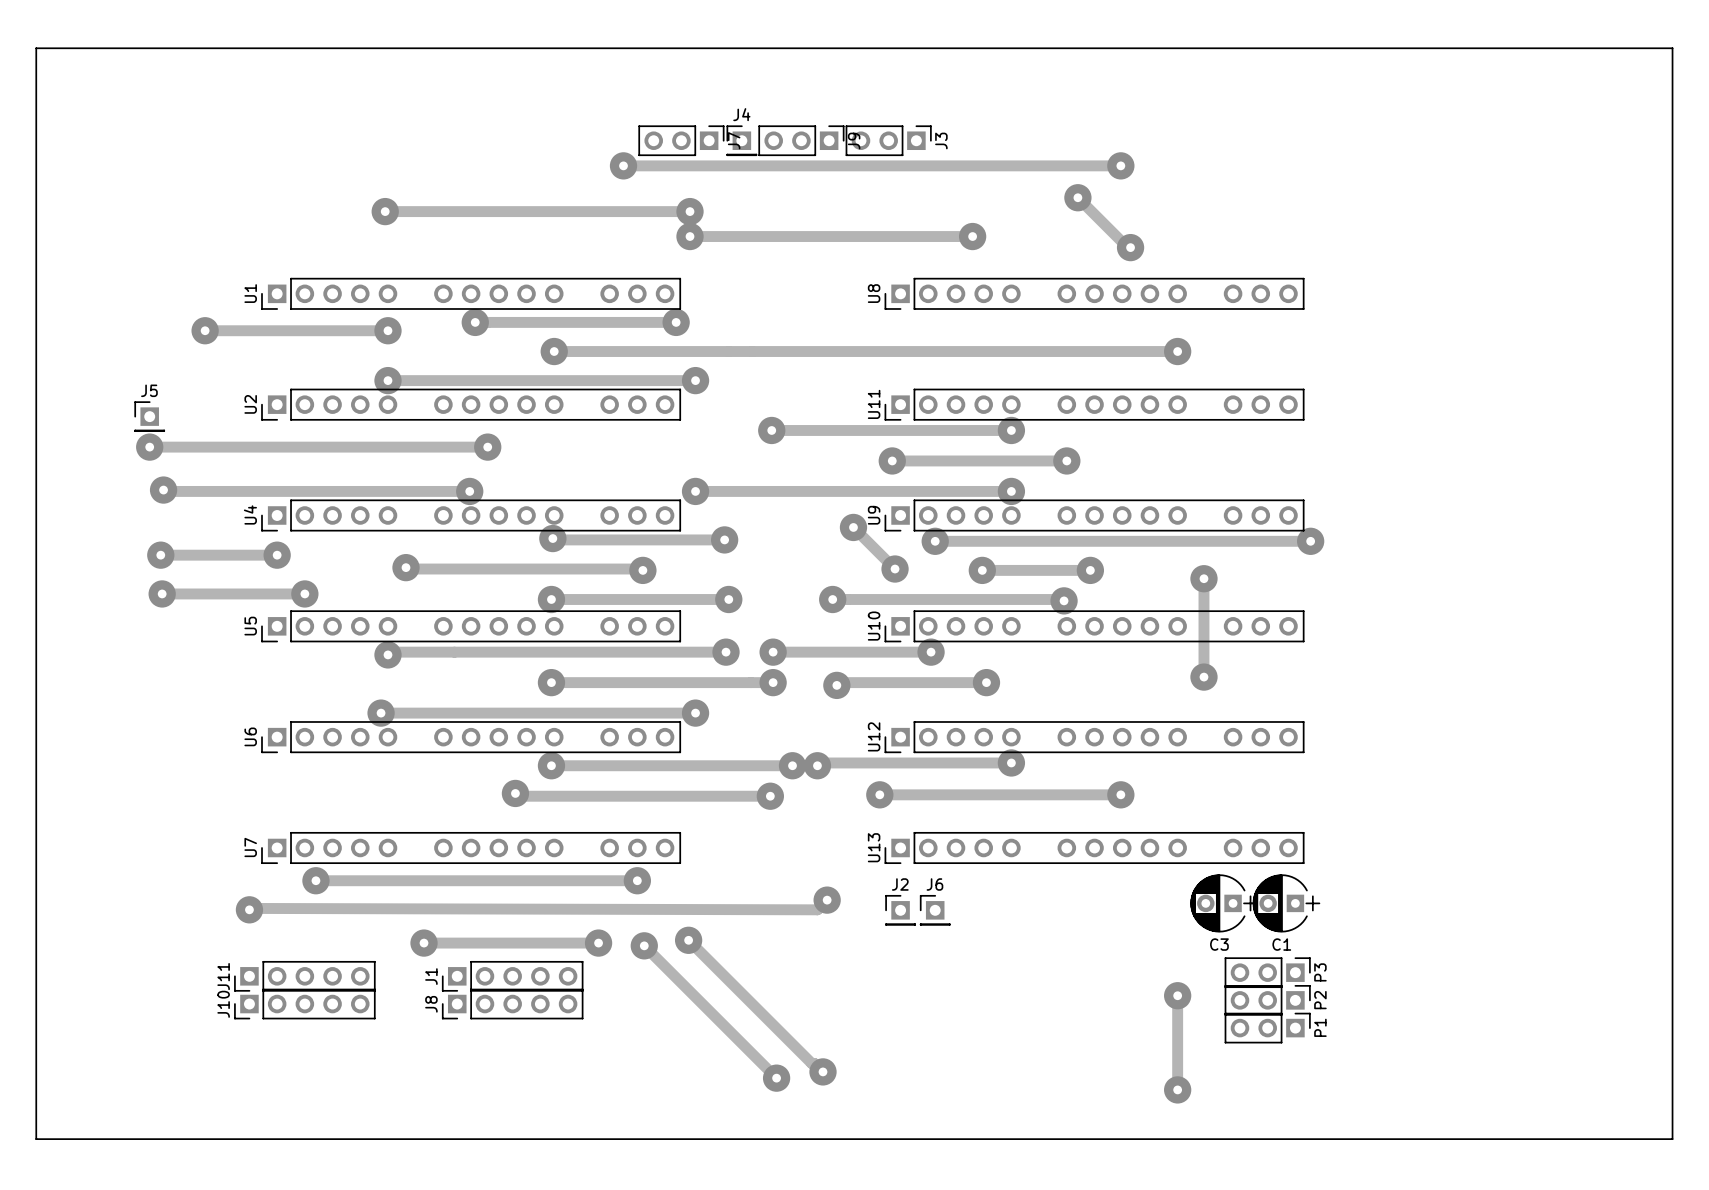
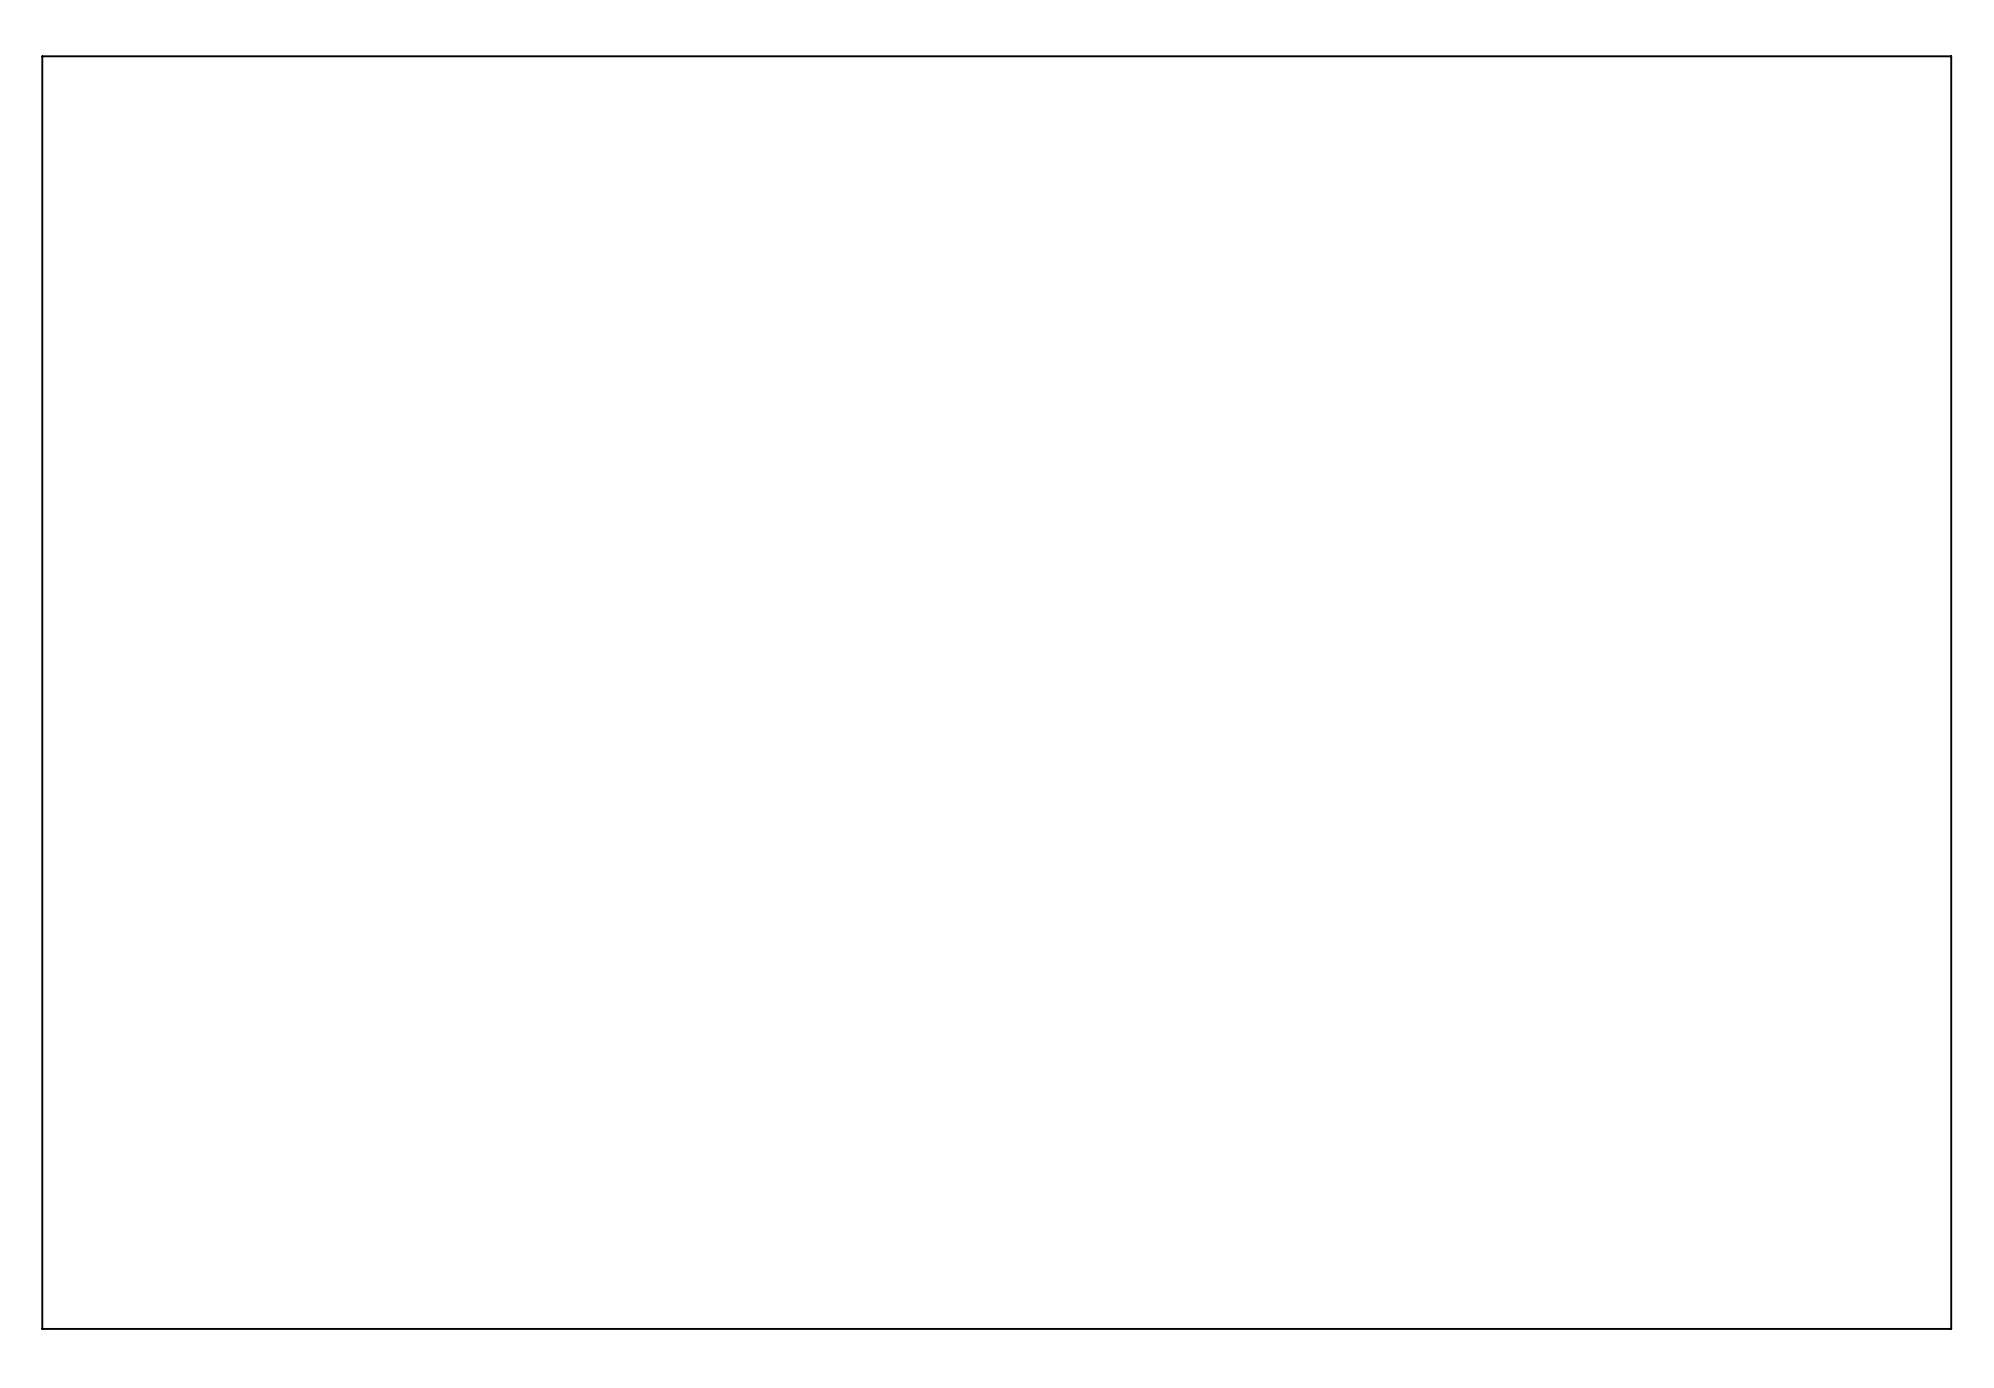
J7: (681, 140) -> none
J4: (741, 140) -> none
J9: (801, 140) -> none
J3: (888, 140) -> none
track: (623, 165) (1120, 165) -> none
via: (623, 165) -> none
via: (1120, 165) -> none
track: (1077, 197) (1127, 247) (1130, 247) -> none
via: (1077, 197) -> none
track: (385, 211) (690, 211) -> none
via: (385, 211) -> none
via: (690, 211) -> none
track: (690, 236) (972, 236) -> none
via: (690, 236) -> none
via: (972, 236) -> none
via: (1130, 247) -> none
U1: (471, 293) -> none
U8: (1094, 293) -> none
track: (475, 322) (676, 322) -> none
via: (475, 322) -> none
via: (676, 322) -> none
track: (205, 330) (387, 330) -> none
via: (205, 330) -> none
via: (387, 330) -> none
track: (554, 351) (1177, 351) -> none
via: (554, 351) -> none
via: (1177, 351) -> none
track: (387, 380) (695, 380) -> none
via: (387, 380) -> none
via: (695, 380) -> none
U2: (471, 404) -> none
U11: (1094, 404) -> none
J5: (149, 416) -> none
track: (771, 430) (1011, 430) -> none
via: (771, 430) -> none
via: (1011, 430) -> none
track: (149, 447) (487, 447) -> none
via: (149, 447) -> none
via: (487, 447) -> none
track: (892, 460) (1066, 460) -> none
via: (892, 460) -> none
via: (1066, 460) -> none
track: (163, 490) (469, 491) -> none
via: (163, 490) -> none
via: (469, 491) -> none
track: (695, 491) (1011, 491) -> none
via: (695, 491) -> none
via: (1011, 491) -> none
U4: (471, 515) -> none
U9: (1094, 515) -> none
track: (853, 527) (895, 569) -> none
via: (853, 527) -> none
track: (552, 538) (724, 539) -> none
via: (552, 538) -> none
via: (724, 539) -> none
track: (935, 541) (1310, 541) -> none
via: (935, 541) -> none
via: (1310, 541) -> none
track: (160, 555) (277, 555) -> none
via: (160, 555) -> none
via: (277, 555) -> none
track: (406, 567) (642, 570) -> none
via: (406, 567) -> none
via: (895, 569) -> none
via: (642, 570) -> none
track: (982, 570) (1090, 570) -> none
via: (982, 570) -> none
via: (1090, 570) -> none
track: (1203, 578) (1203, 677) -> none
via: (1203, 578) -> none
track: (162, 593) (304, 593) -> none
via: (162, 593) -> none
via: (304, 593) -> none
track: (551, 599) (728, 599) -> none
via: (551, 599) -> none
via: (728, 599) -> none
track: (832, 599) (1064, 600) -> none
via: (832, 599) -> none
via: (1064, 600) -> none
U5: (471, 626) -> none
U10: (1094, 626) -> none
track: (726, 652) (390, 652) (387, 654) -> none
via: (726, 652) -> none
track: (773, 652) (931, 652) -> none
via: (773, 652) -> none
via: (931, 652) -> none
via: (387, 654) -> none
via: (1203, 677) -> none
track: (551, 682) (773, 682) -> none
via: (551, 682) -> none
via: (773, 682) -> none
track: (986, 682) (839, 682) (836, 685) -> none
via: (986, 682) -> none
via: (836, 685) -> none
track: (381, 713) (695, 713) -> none
via: (381, 713) -> none
via: (695, 713) -> none
U6: (471, 737) -> none
U12: (1094, 737) -> none
track: (1011, 762) (820, 762) (817, 765) -> none
via: (1011, 762) -> none
track: (551, 765) (792, 765) -> none
via: (551, 765) -> none
via: (792, 765) -> none
via: (817, 765) -> none
track: (515, 793) (518, 796) (770, 796) -> none
via: (515, 793) -> none
track: (879, 794) (1120, 794) -> none
via: (879, 794) -> none
via: (1120, 794) -> none
via: (770, 796) -> none
U7: (471, 847) -> none
U13: (1094, 847) -> none
track: (315, 880) (637, 880) -> none
via: (315, 880) -> none
via: (637, 880) -> none
track: (827, 900) (817, 909) (249, 909) -> none
via: (827, 900) -> none
C3: (1224, 903) -> none
C1: (1286, 903) -> none
via: (249, 909) -> none
J2: (900, 910) -> none
J6: (935, 910) -> none
track: (688, 940) (811, 1063) (814, 1063) (823, 1071) -> none
via: (688, 940) -> none
track: (424, 943) (598, 943) -> none
via: (424, 943) -> none
via: (598, 943) -> none
track: (644, 945) (777, 1078) -> none
via: (644, 945) -> none
P3: (1267, 972) -> none
J11: (304, 976) -> none
J1: (512, 976) -> none
track: (1177, 995) (1177, 1089) -> none
via: (1177, 995) -> none
P2: (1267, 1000) -> none
J10: (304, 1004) -> none
J8: (512, 1004) -> none
P1: (1267, 1028) -> none
via: (823, 1071) -> none
via: (776, 1078) -> none
via: (1177, 1089) -> none

